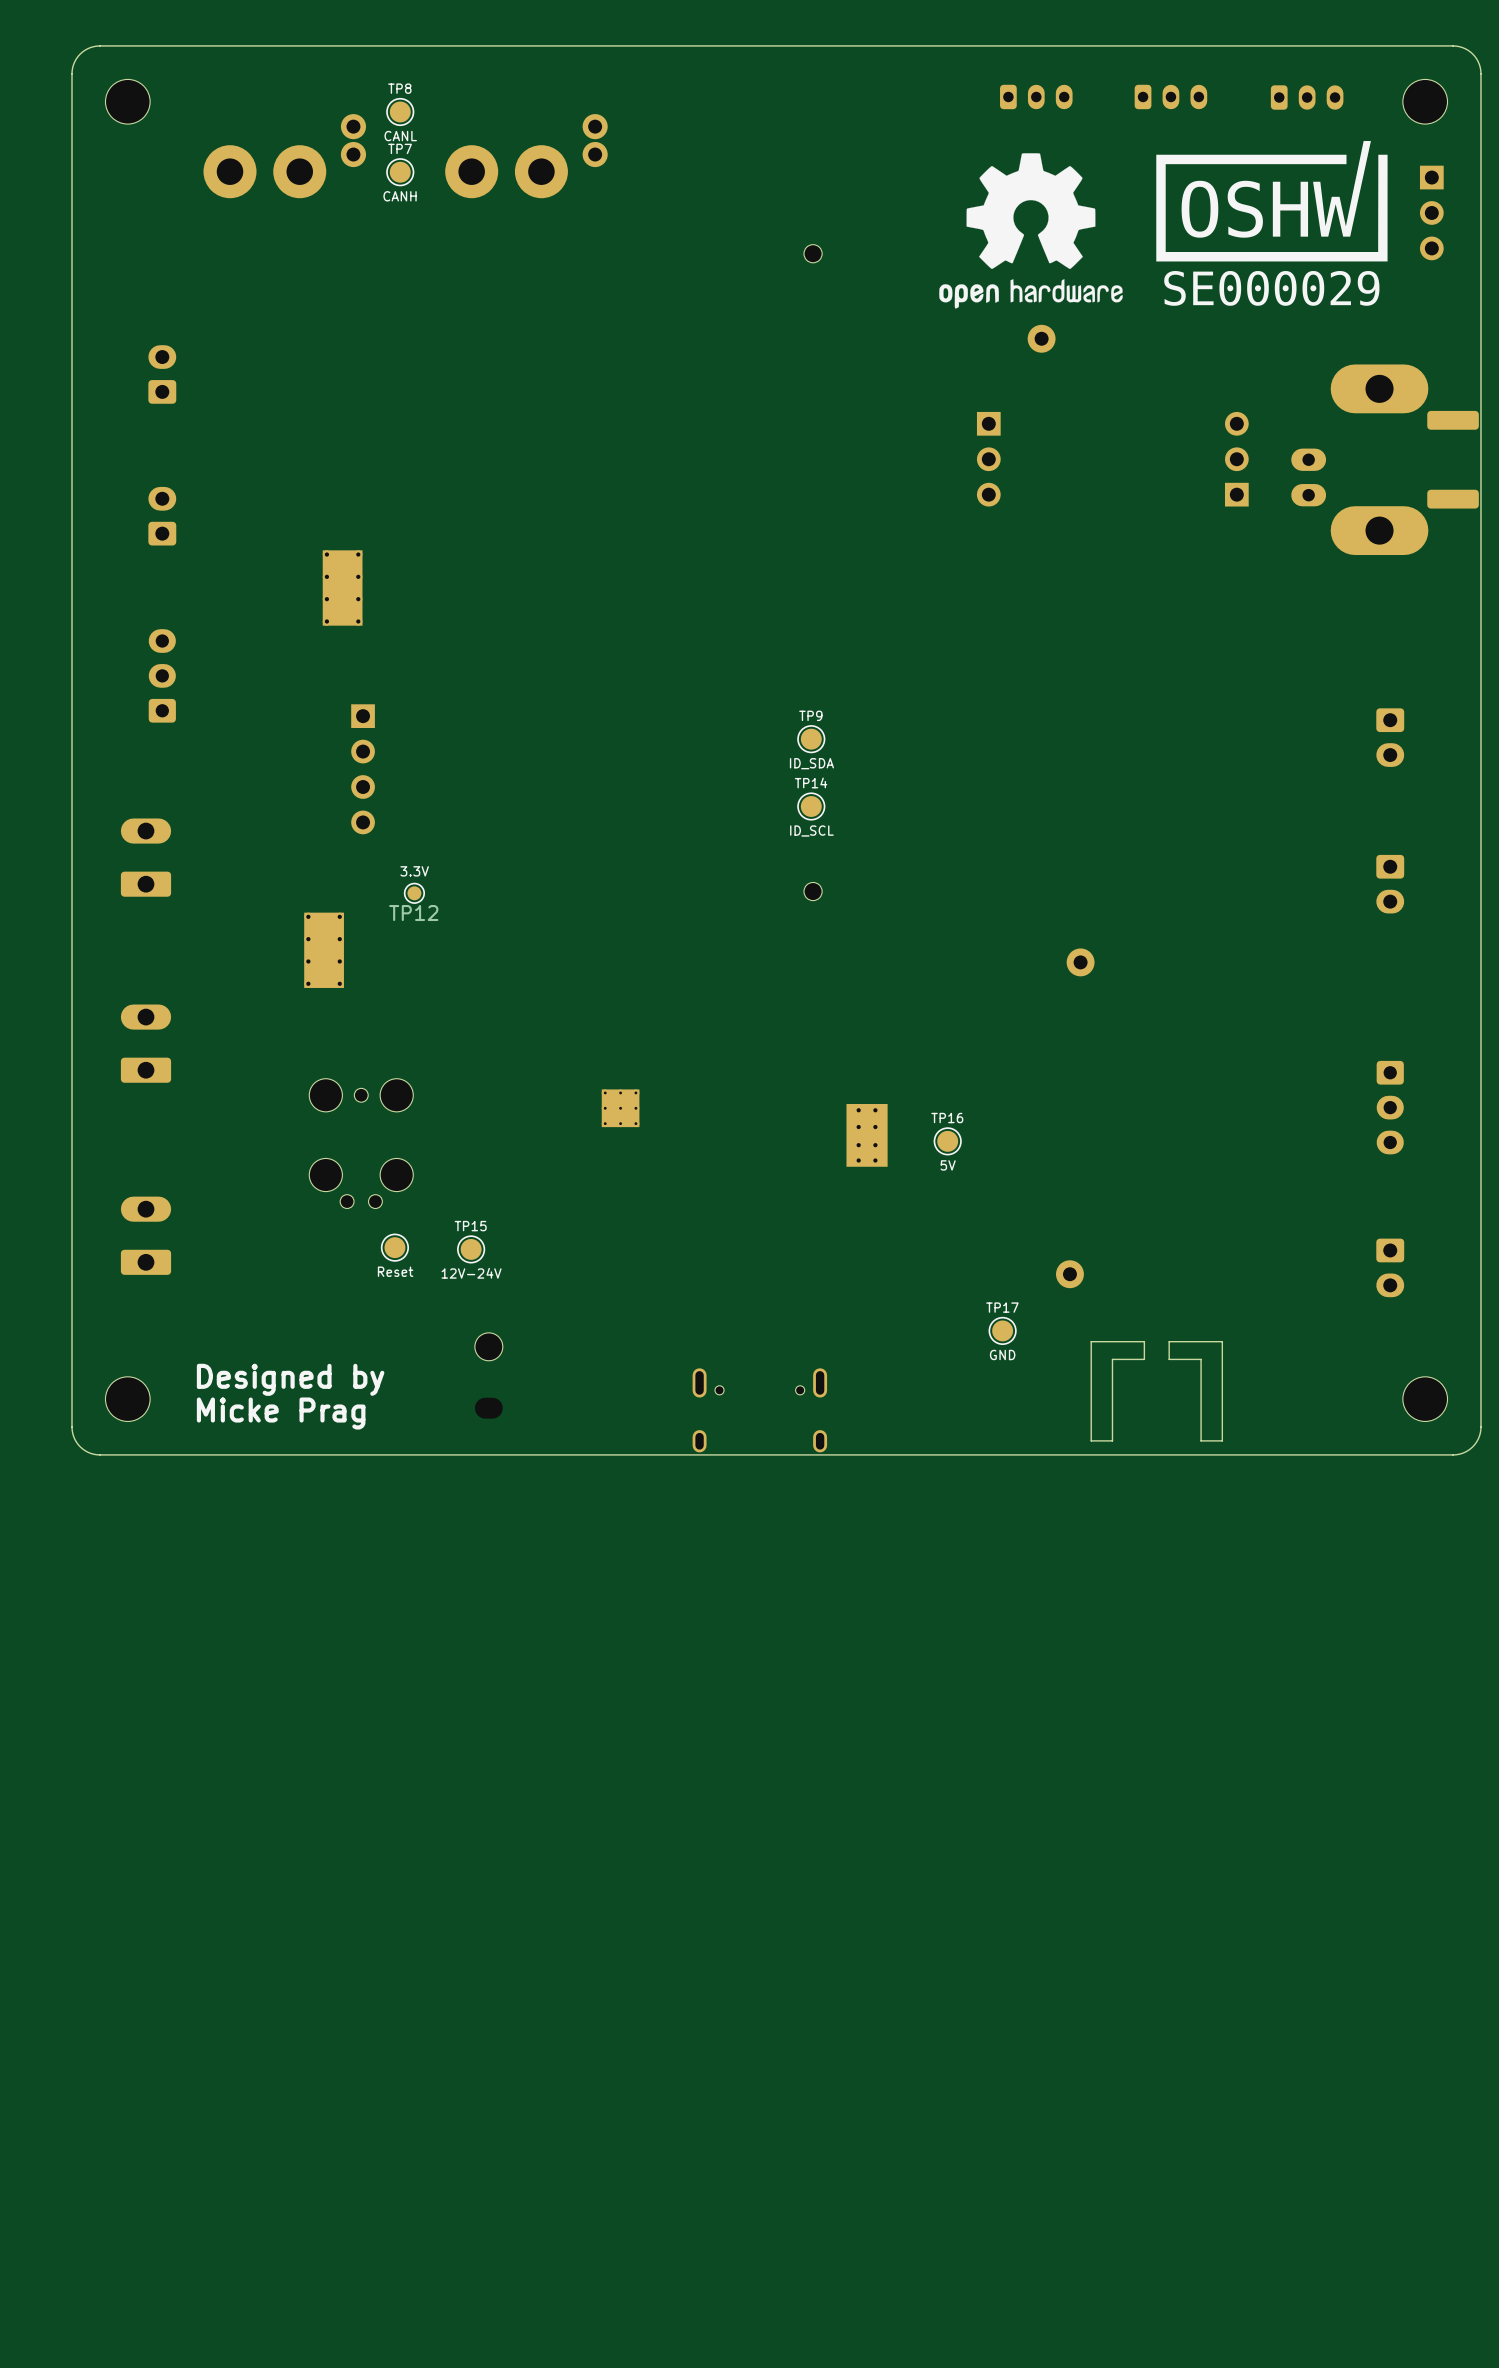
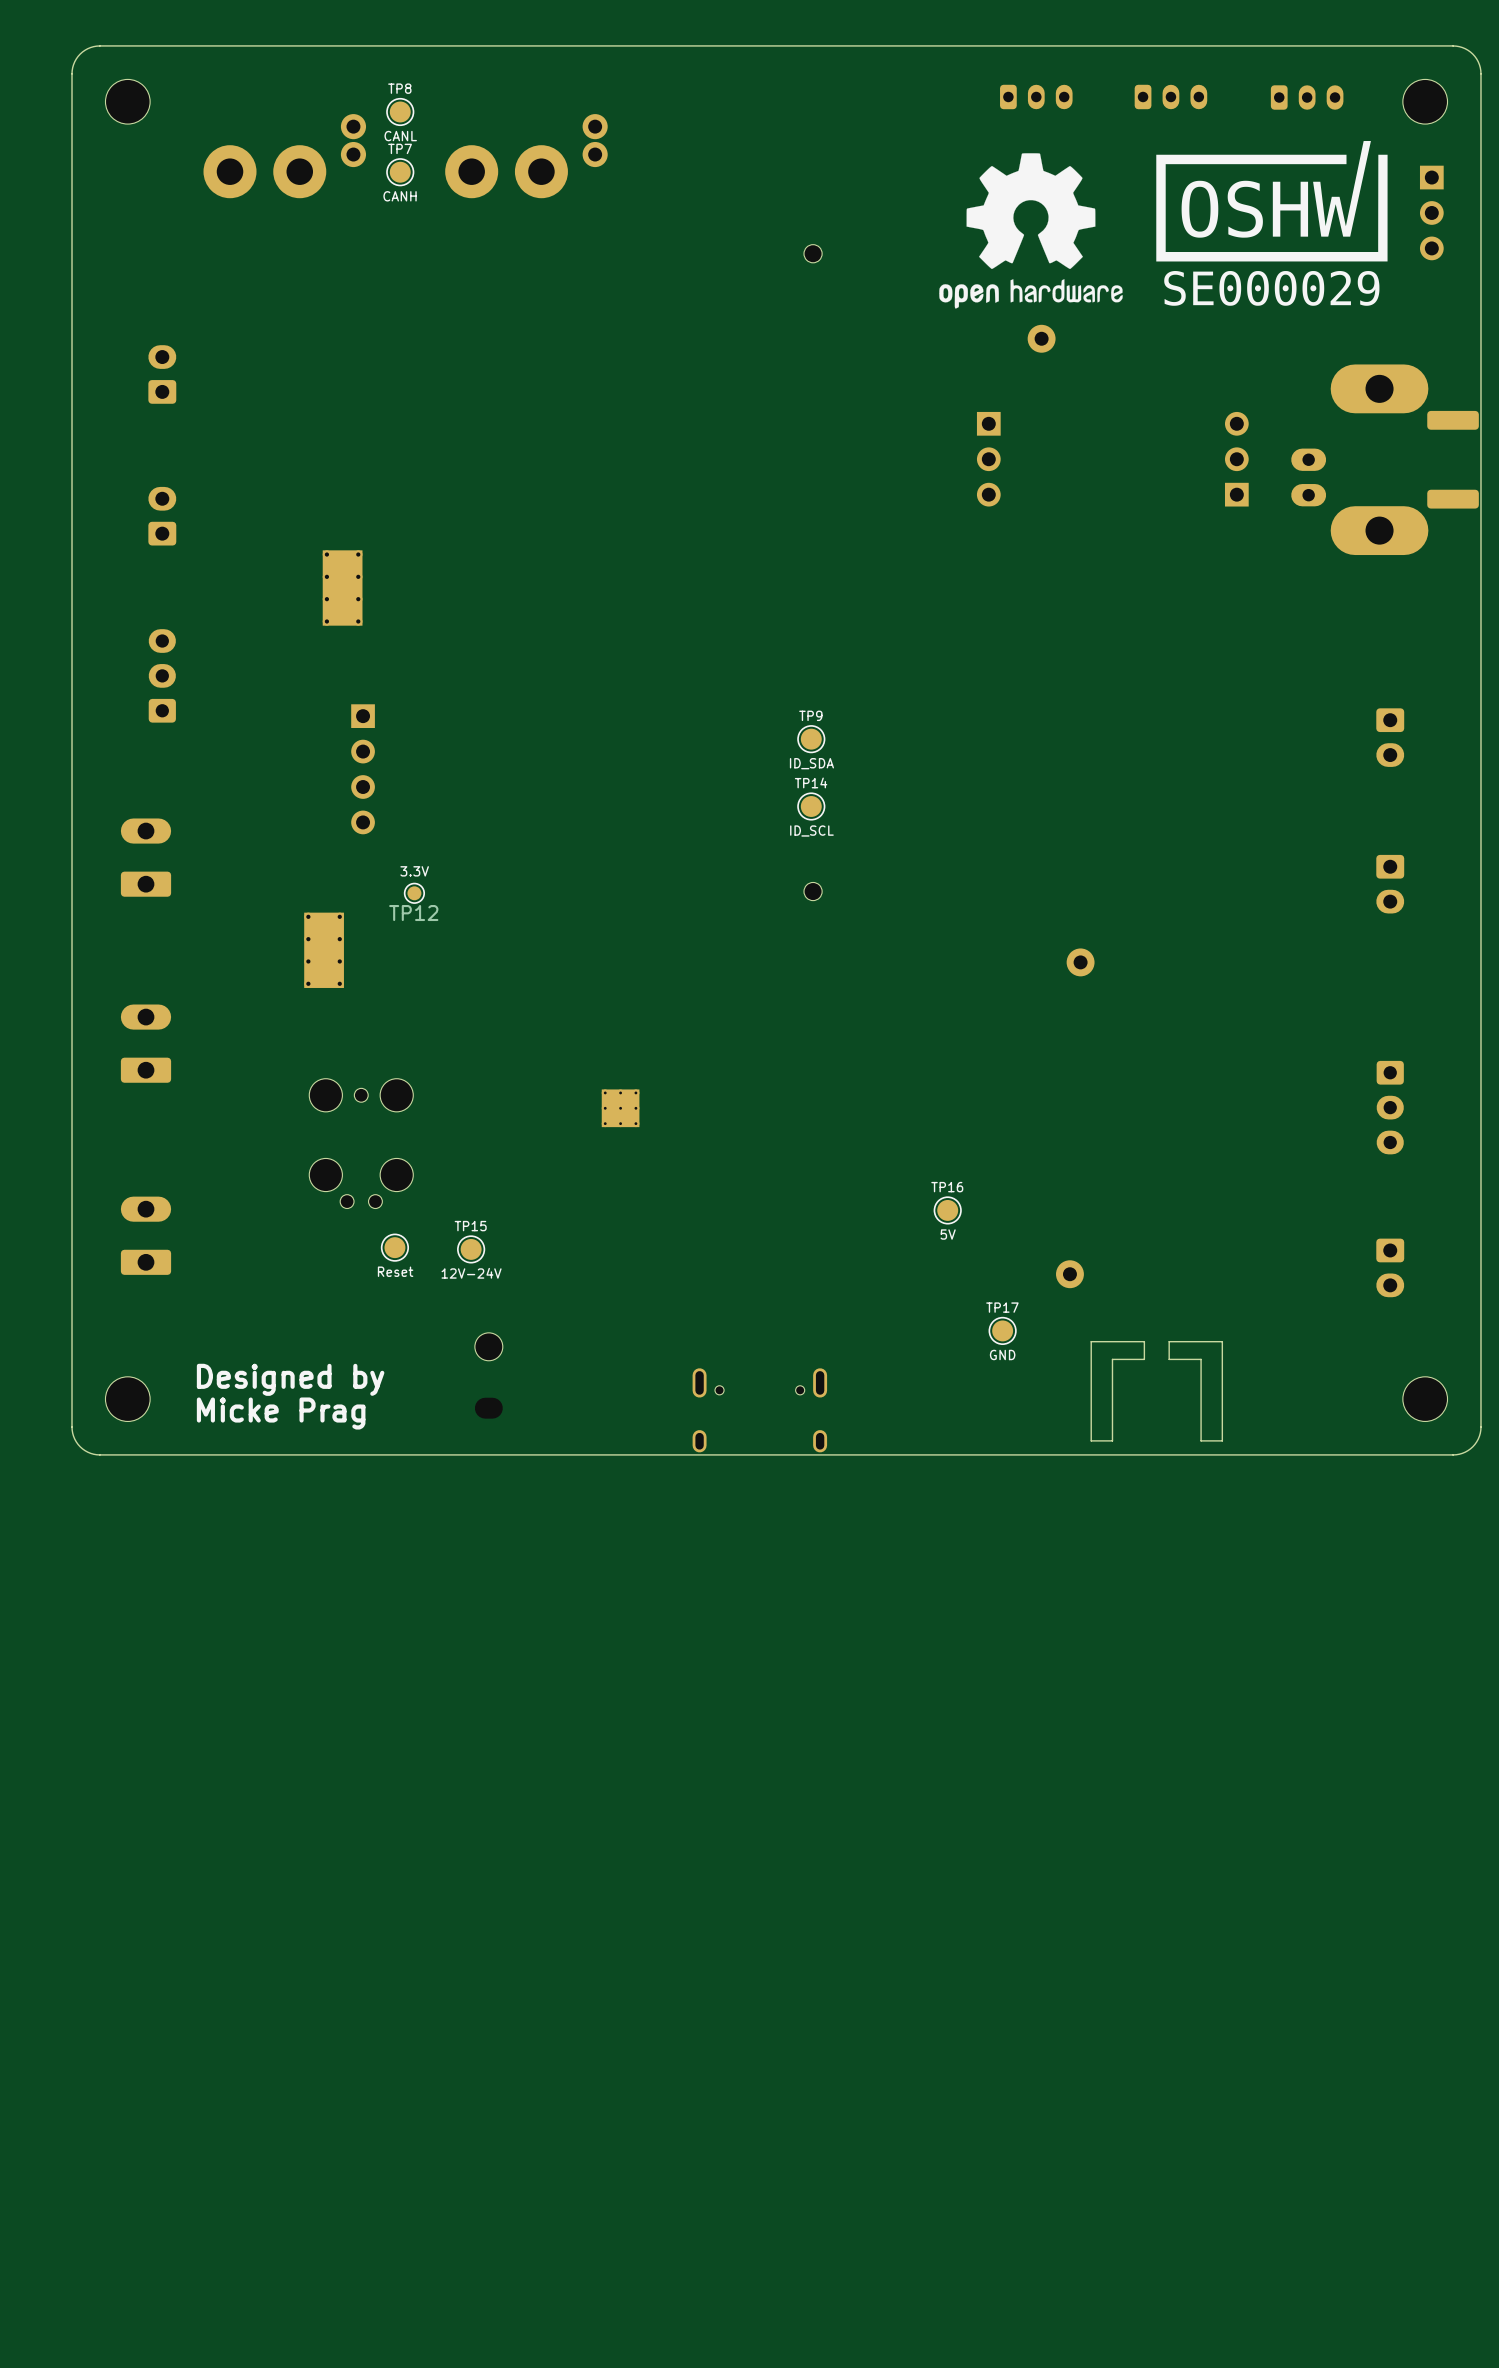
part: (867, 1135) -> none
TP16 position: (947, 1141) -> (947, 1210)

